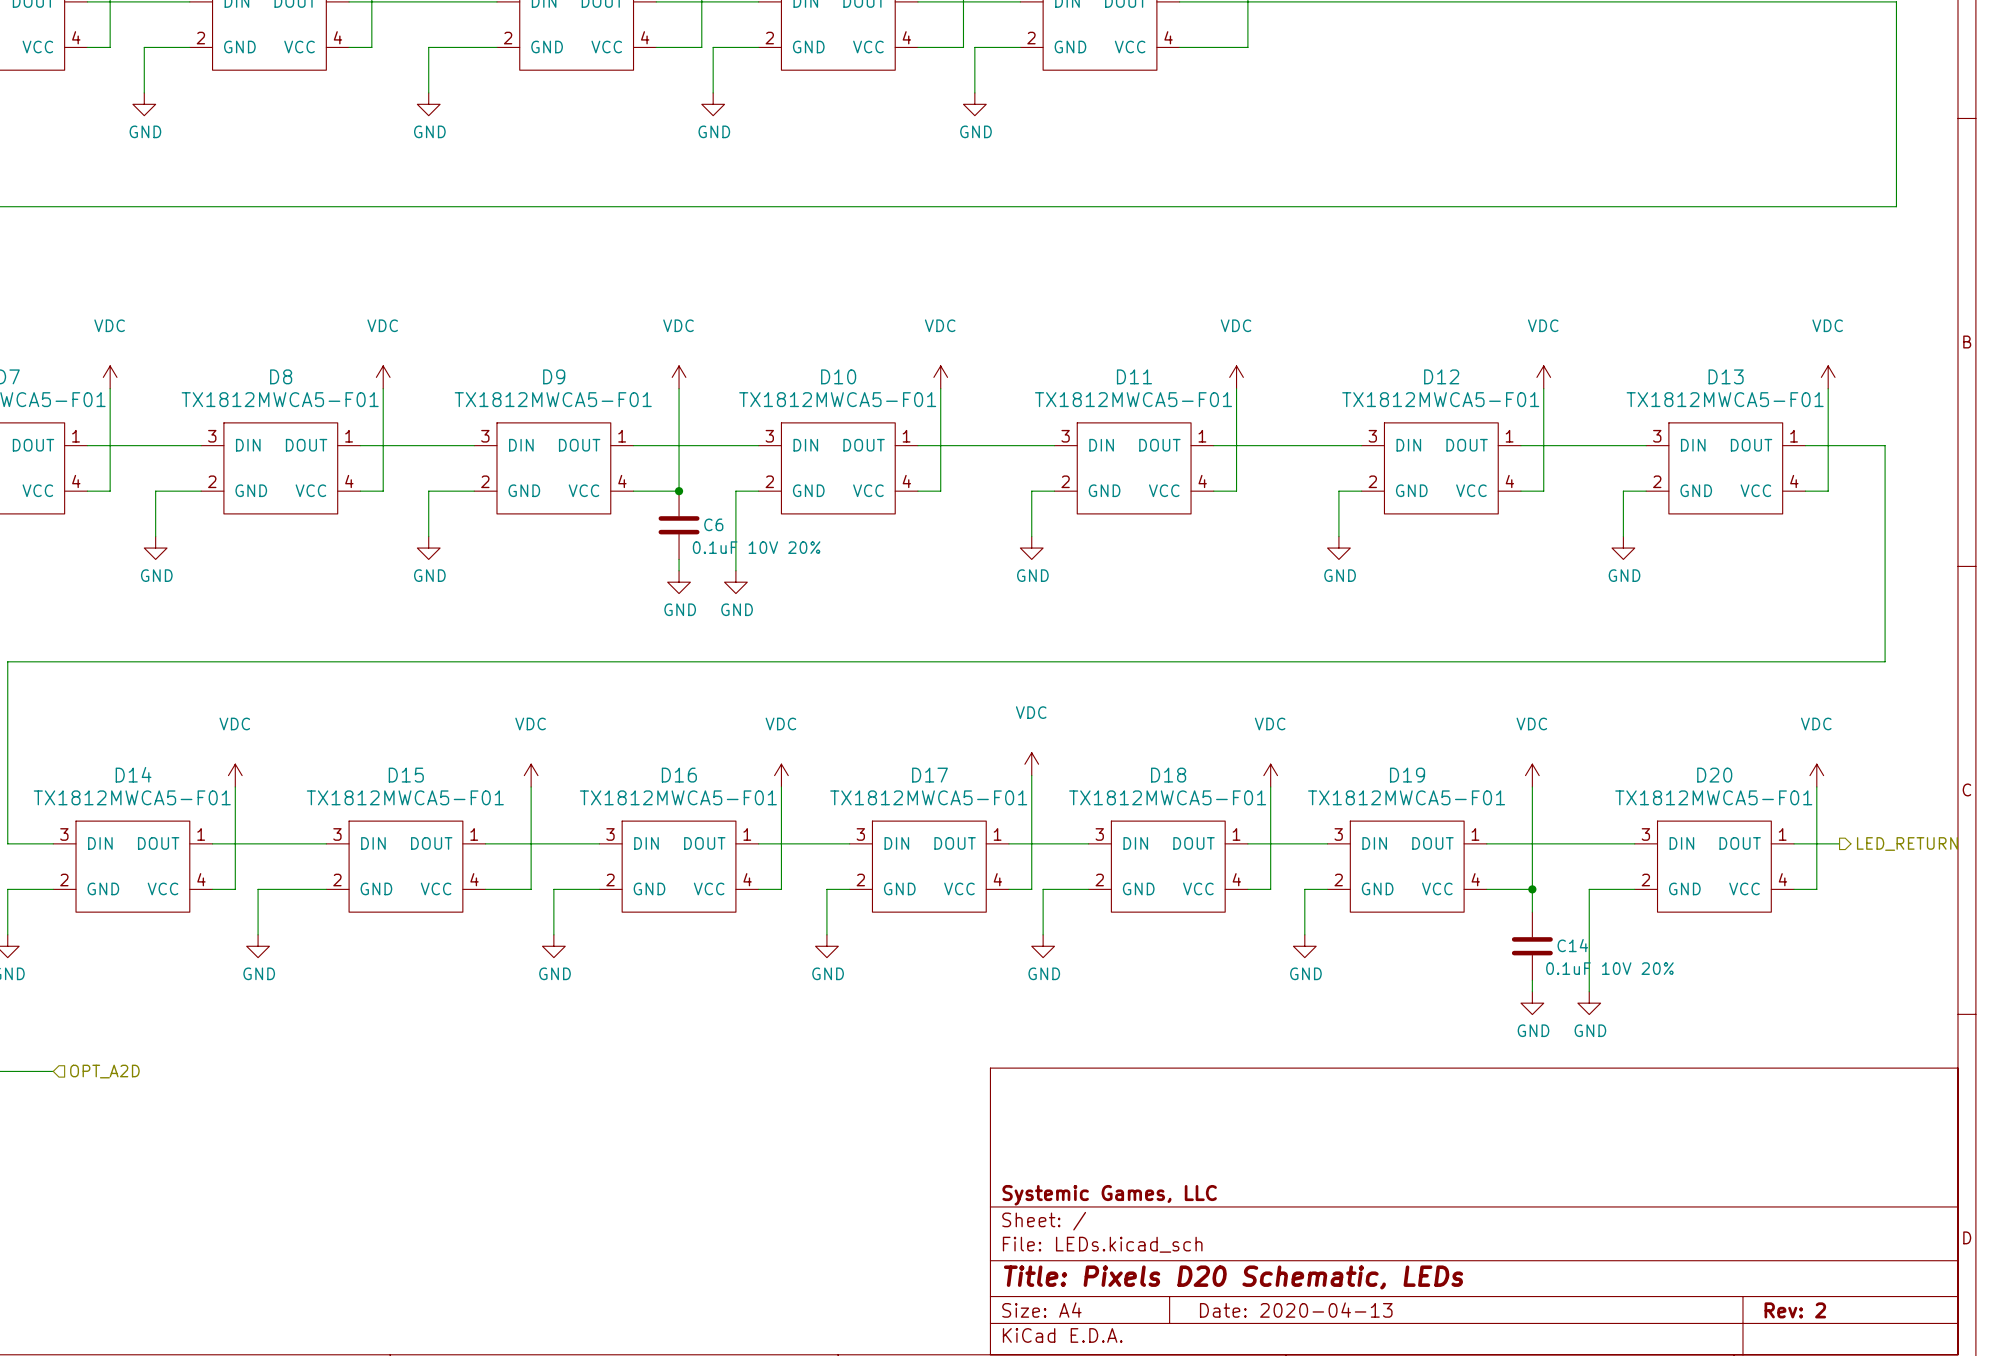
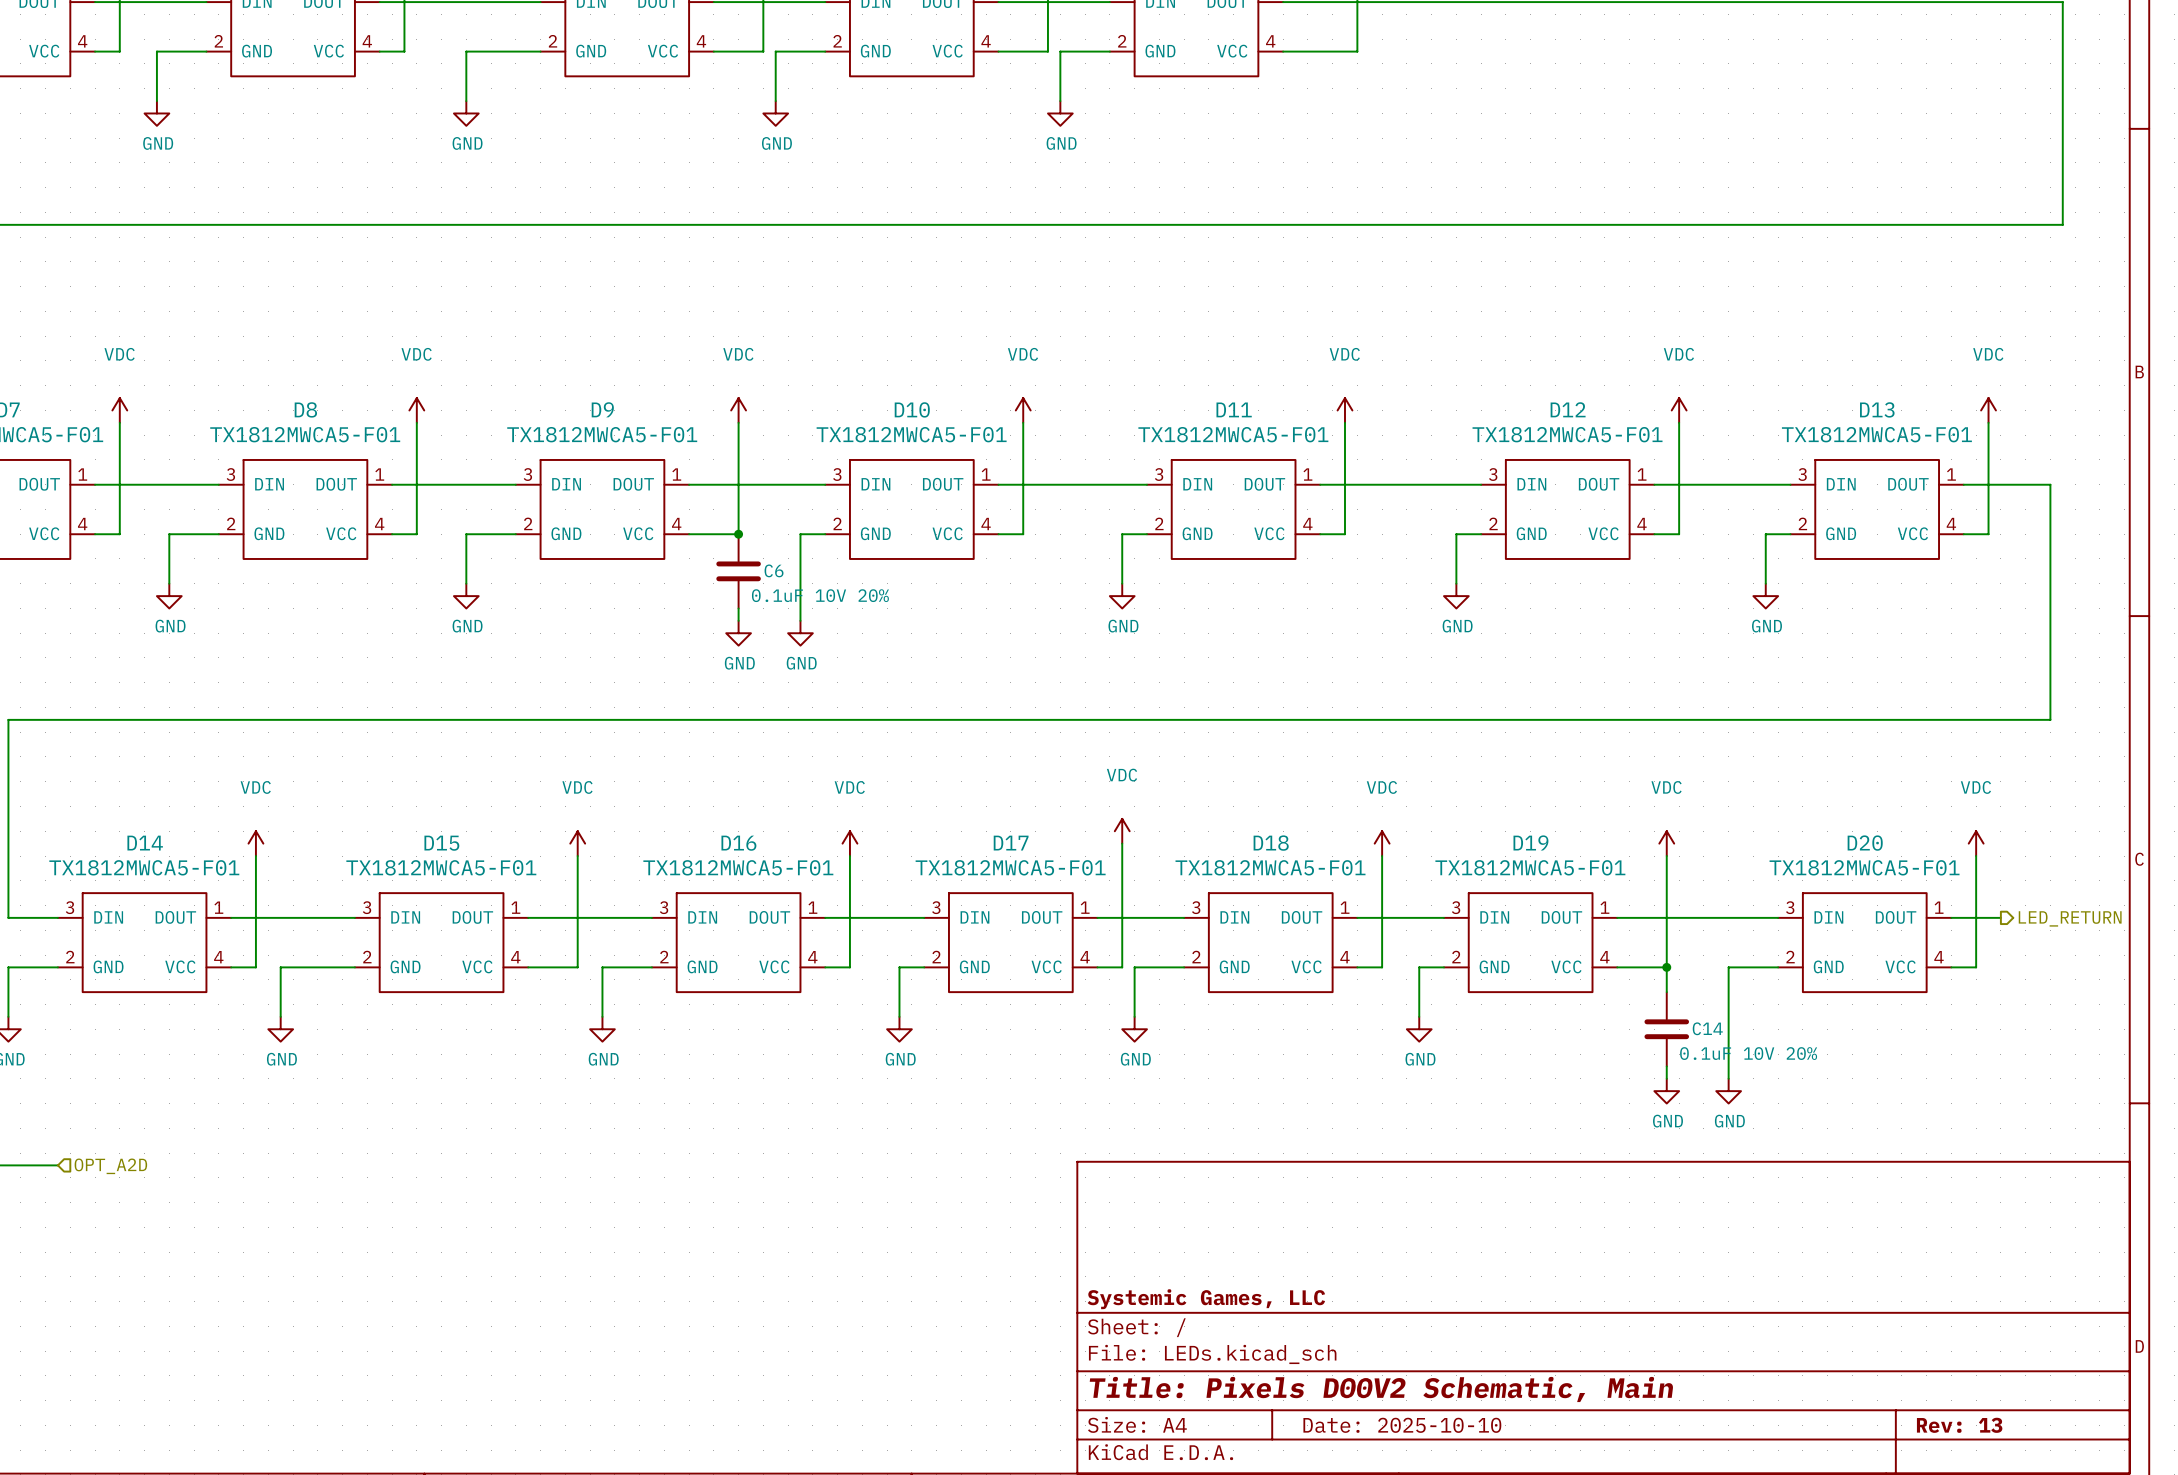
title block: Title: Pixels D20 Schematic, LEDs (1233, 1277) -> Title: Pixels D00V2 Schematic, Main (1381, 1389)
title block: Date: 2020-04-13 (1296, 1310) -> Date: 2025-10-10 (1402, 1425)
title block: Rev: 2 (1795, 1310) -> Rev: 13 (1959, 1425)

